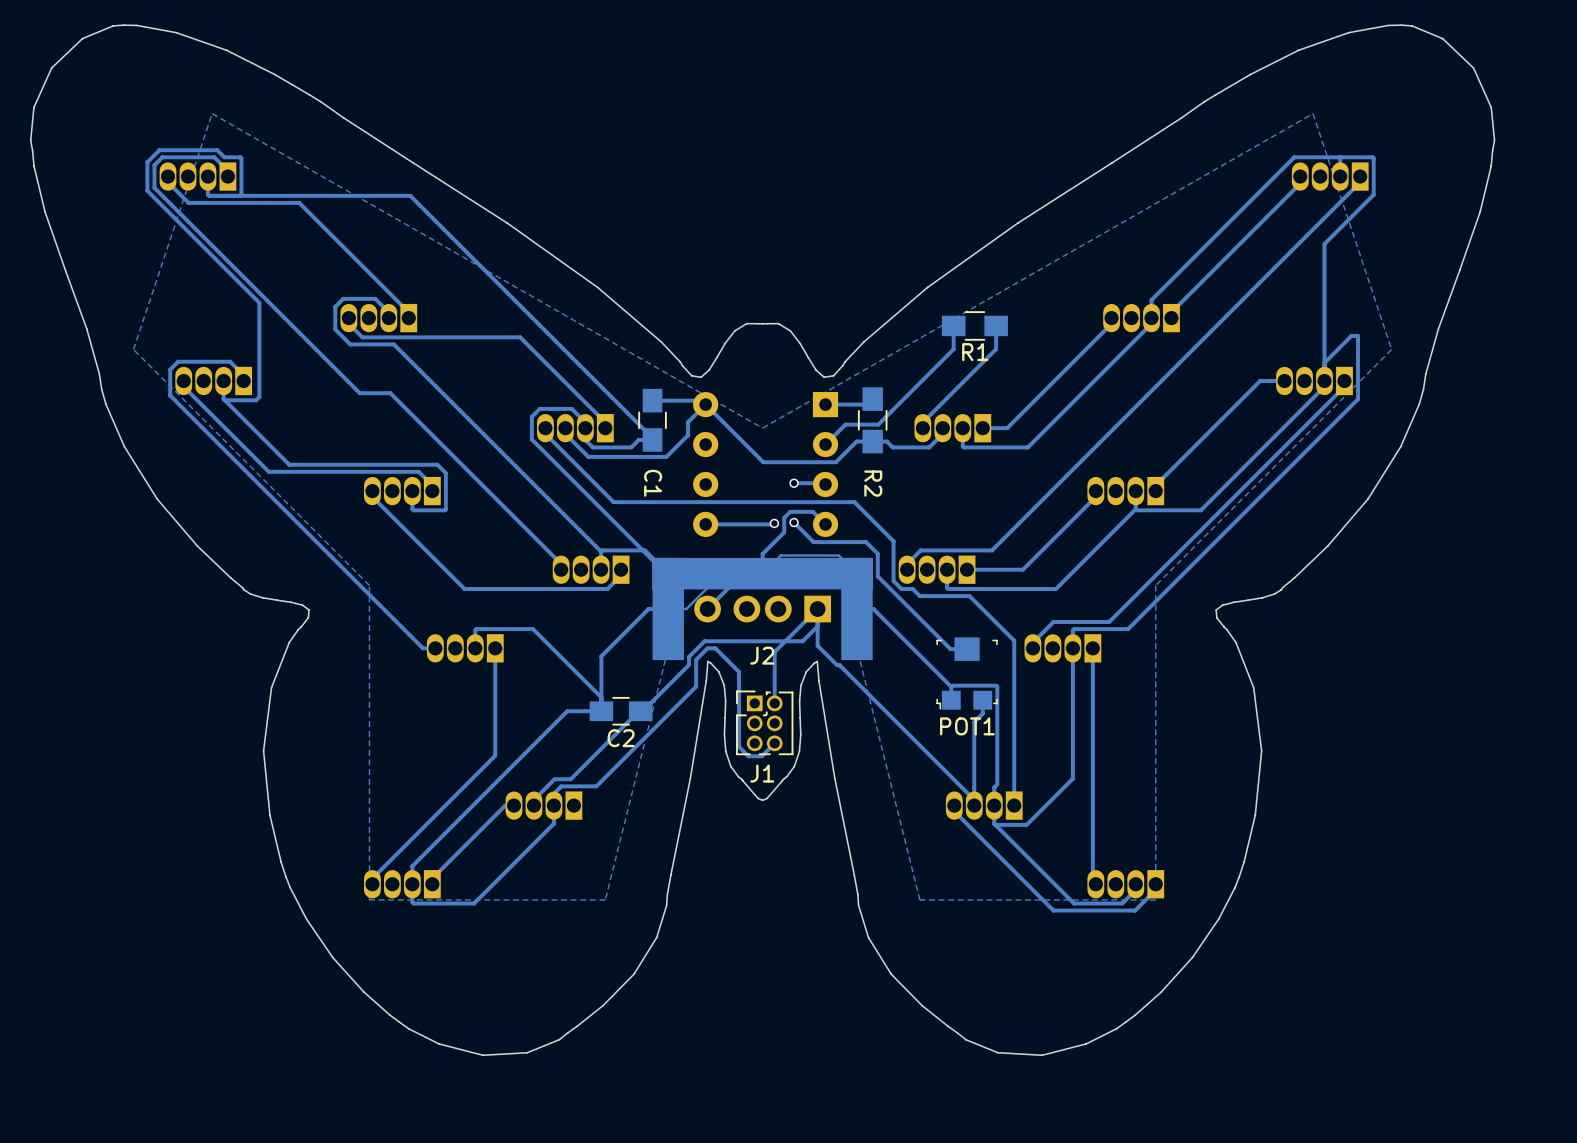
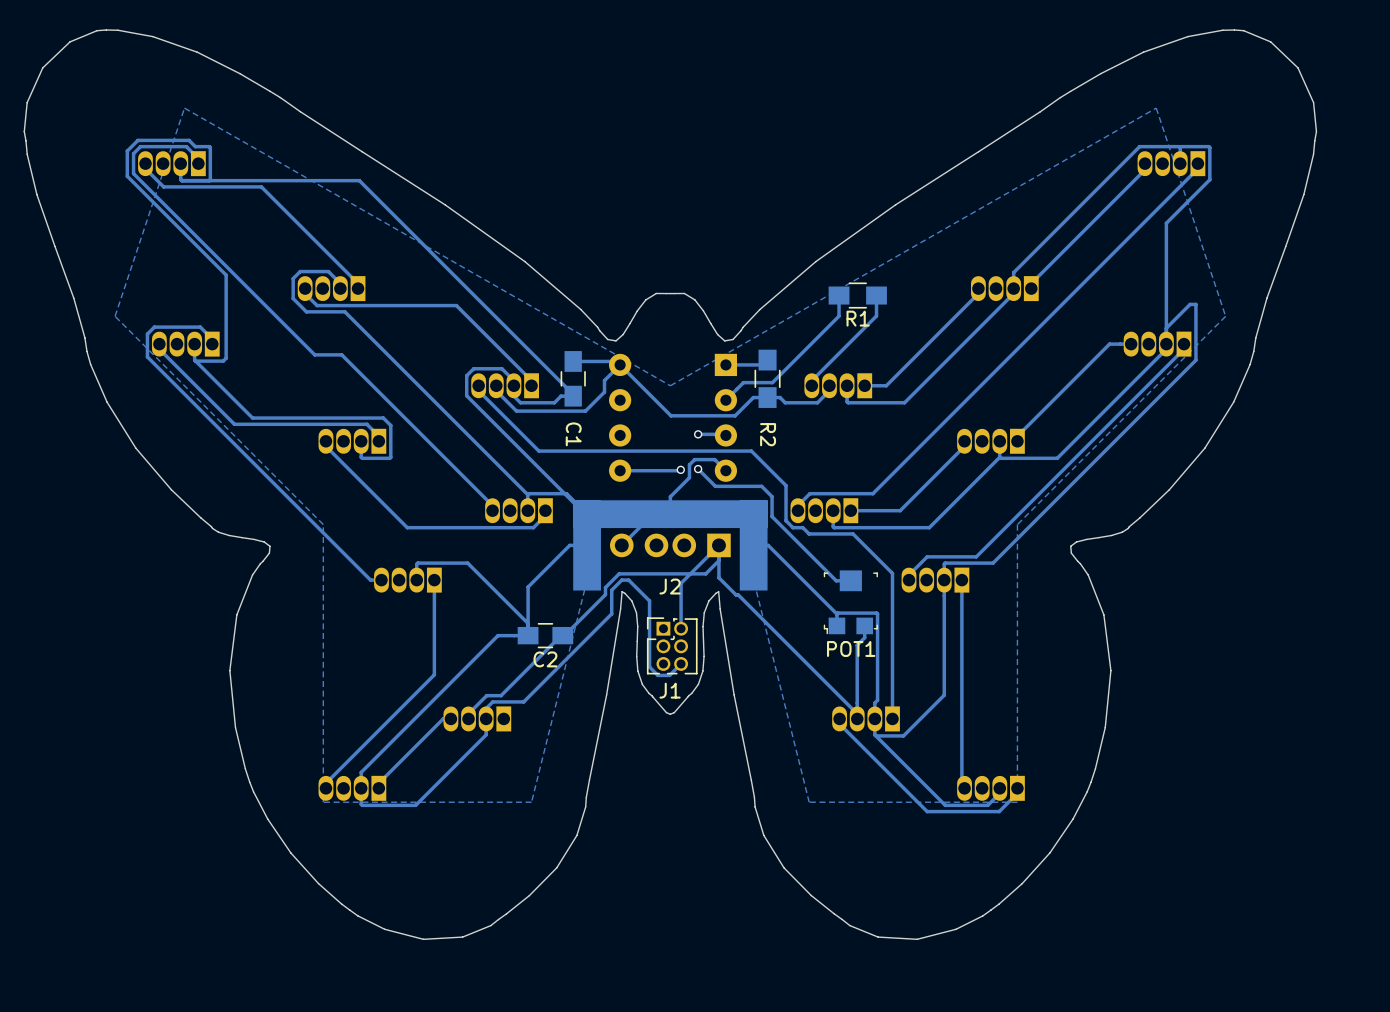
track: (856, 609) (856, 573) (838, 555) (780, 555) (762, 573) (721, 573) (686, 609) (668, 609) -> none

